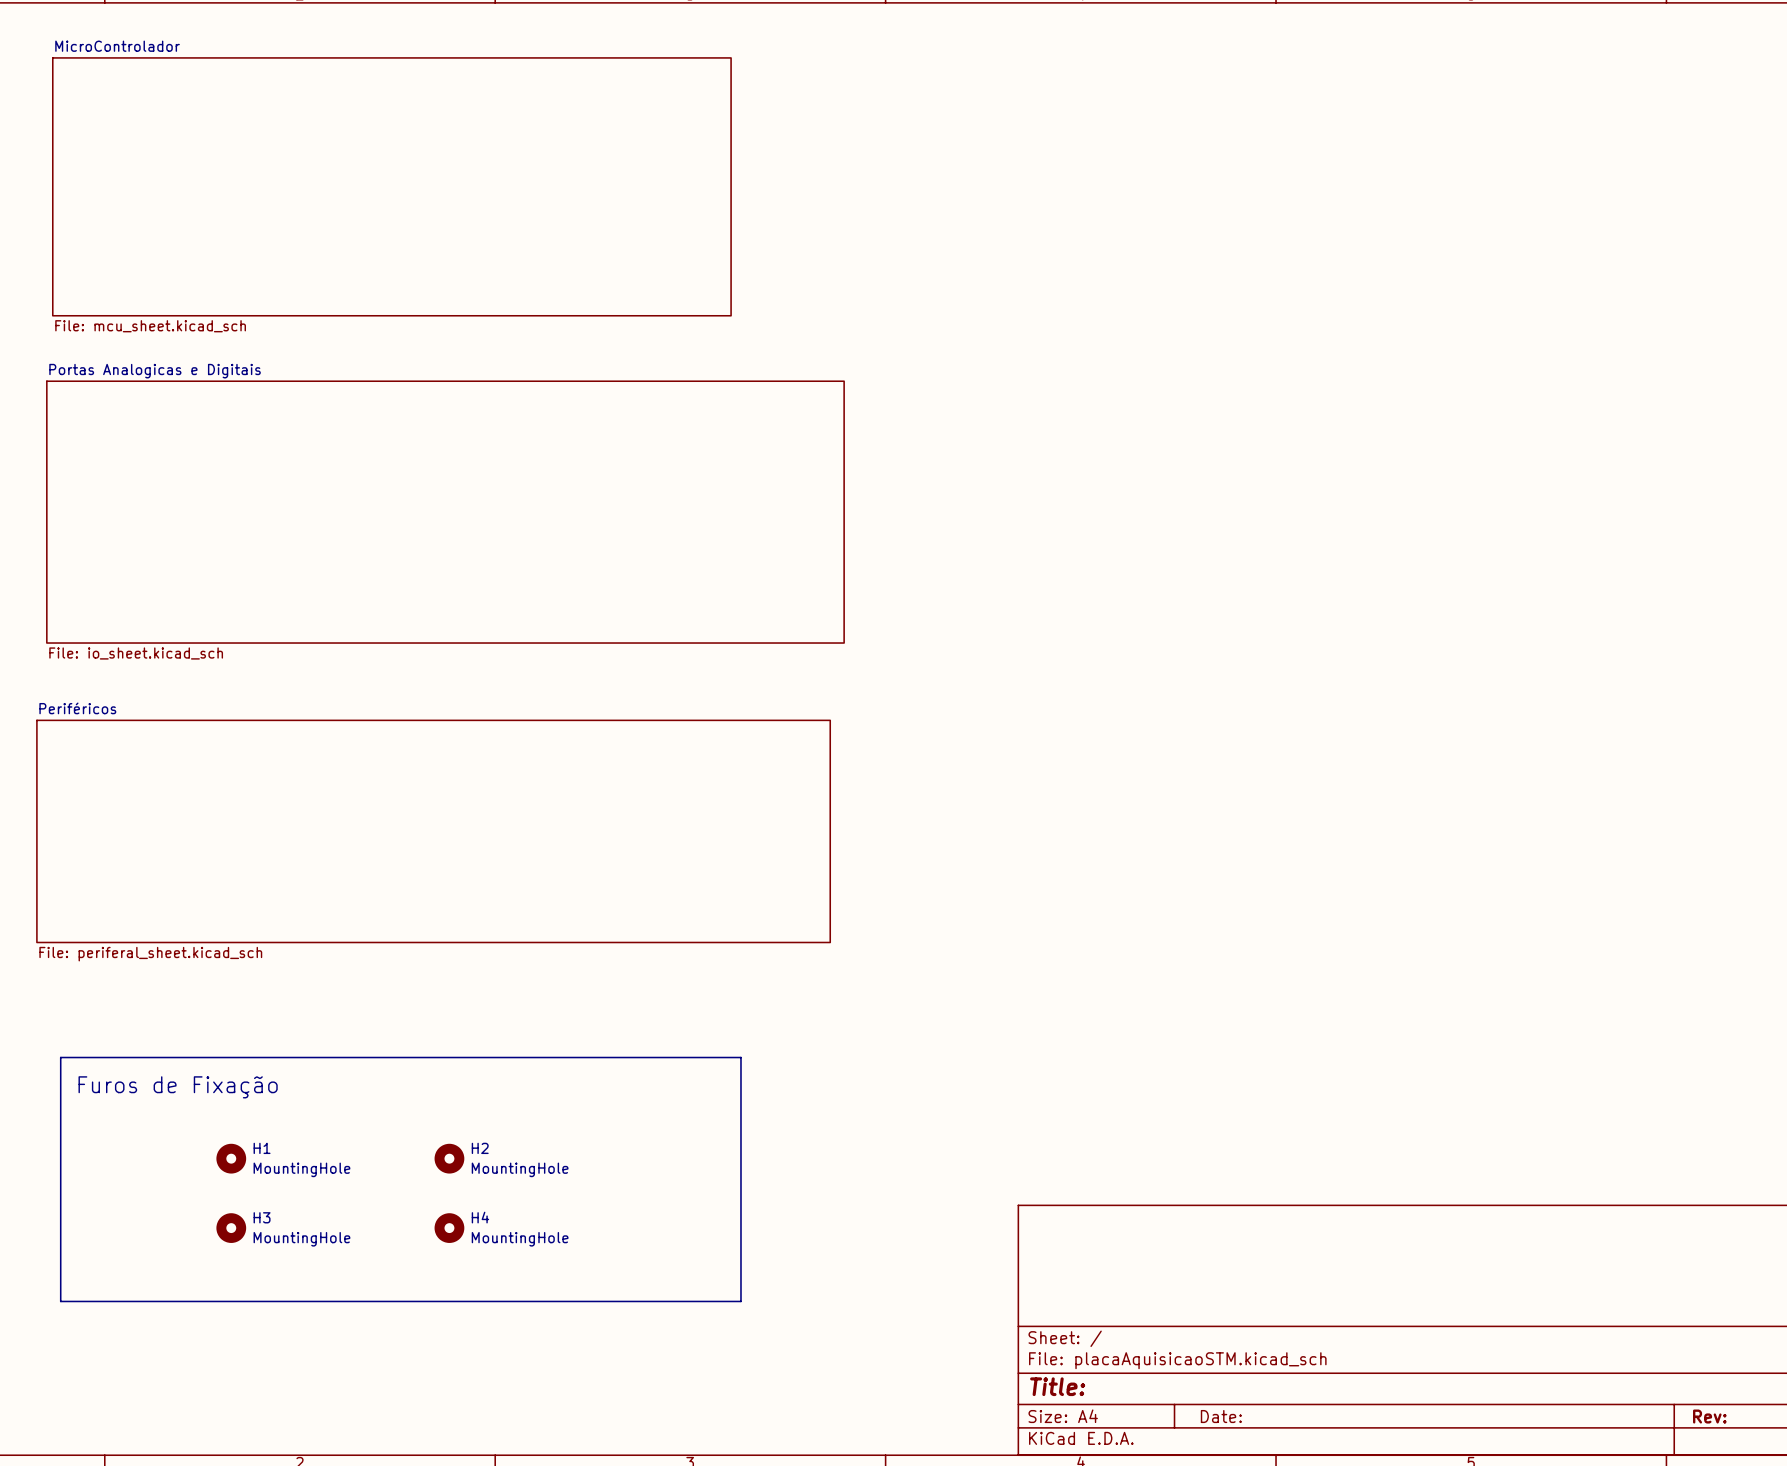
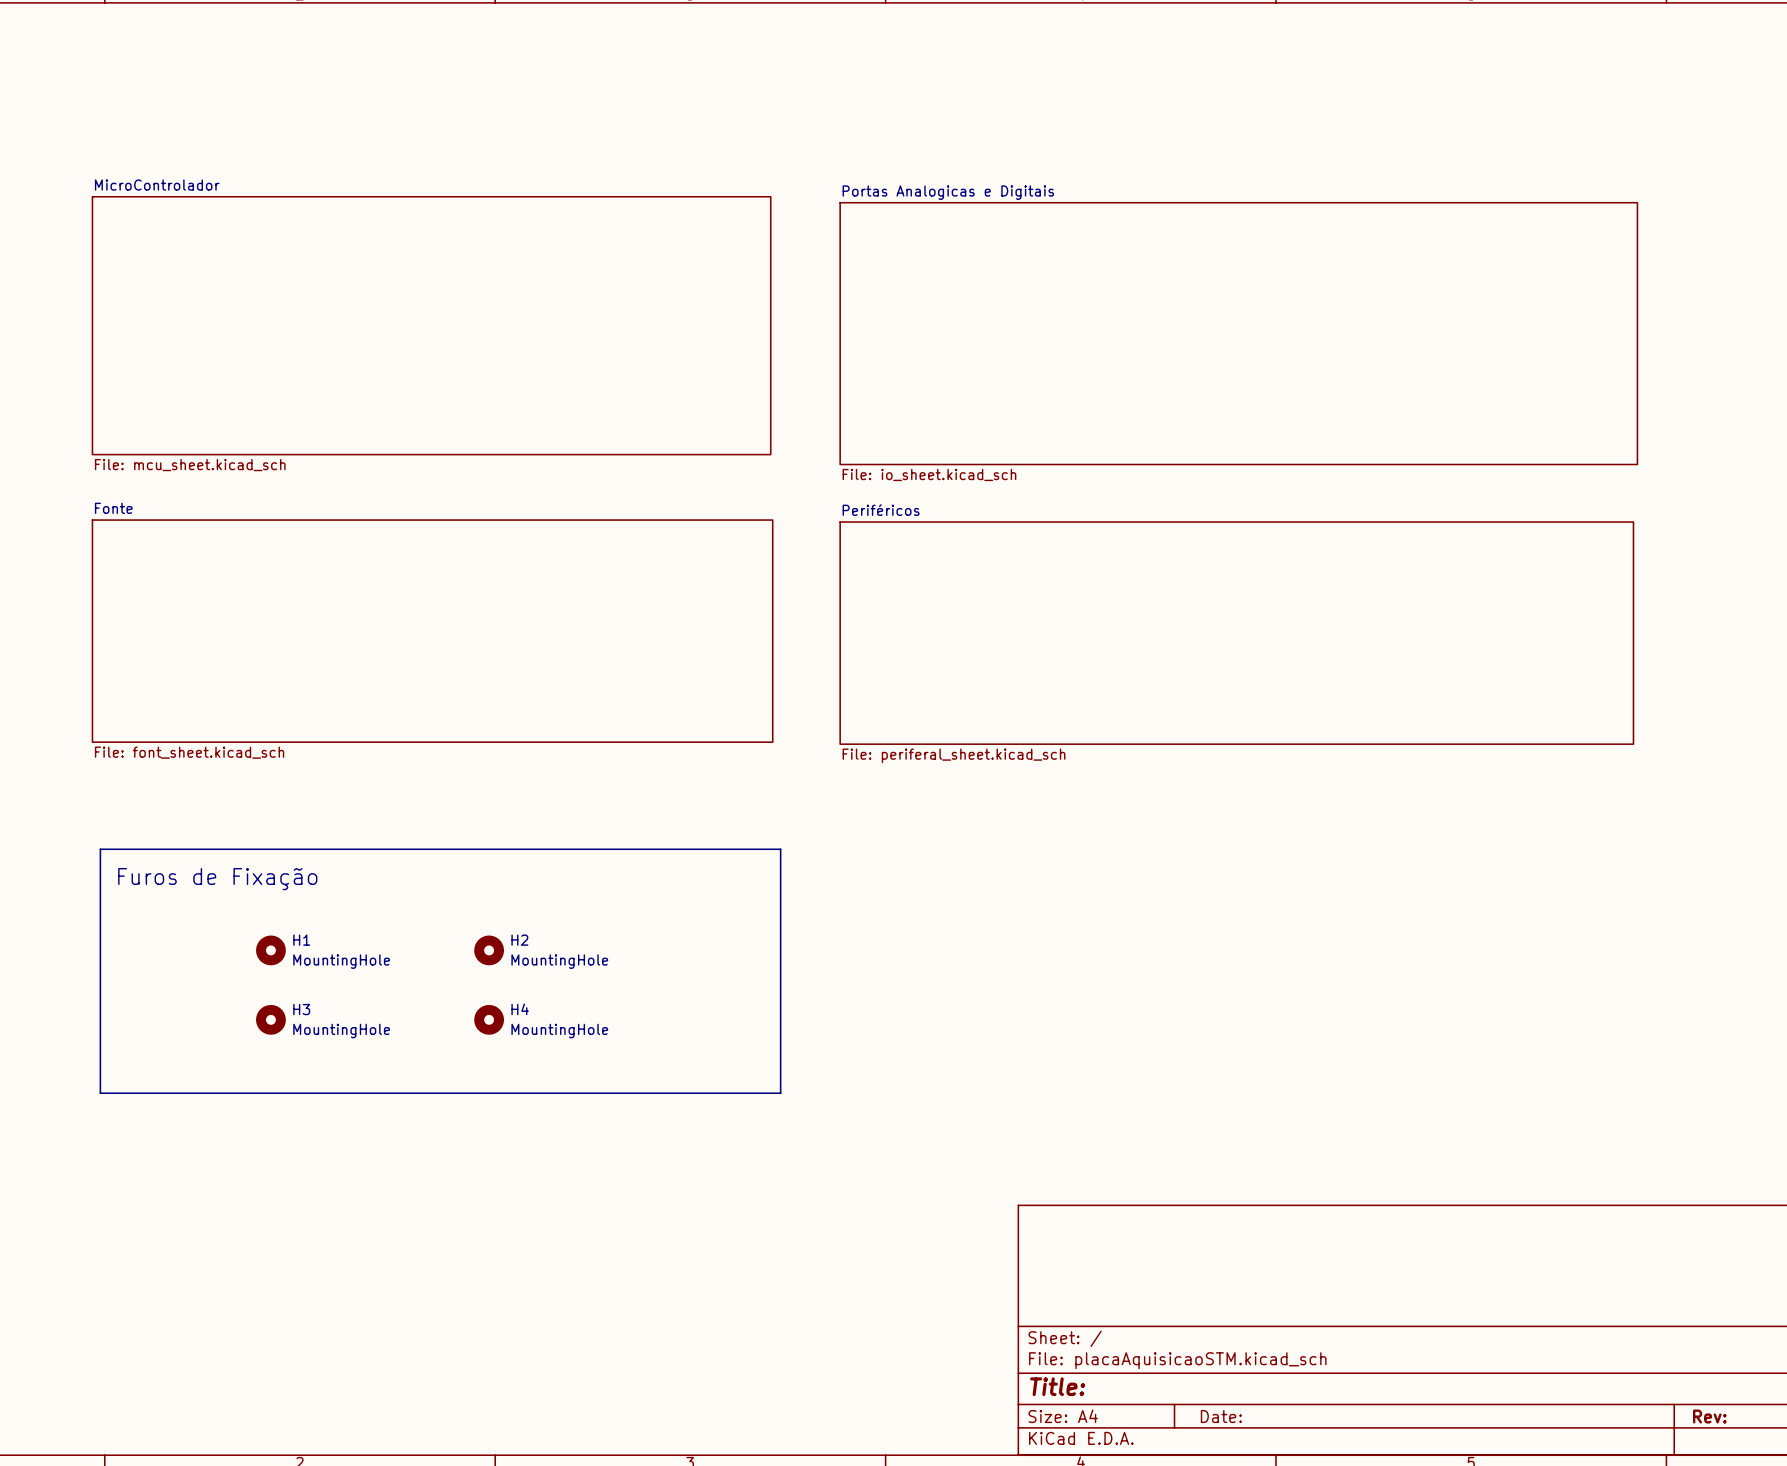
sheet MicroControlador position: (391, 186) -> (431, 325)
sheet Portas Analogicas e Digitais: none -> File: io_sheet.kicad_sch (1238, 333)
sheet Portas Analogicas e Digitais: File: io_sheet.kicad_sch (445, 512) -> none
sheet Fonte: none -> File: font_sheet.kicad_sch (432, 631)
sheet Periféricos: none -> File: periferal_sheet.kicad_sch (1236, 633)
sheet Periféricos: File: periferal_sheet.kicad_sch (433, 831) -> none
line: none -> (100, 849) (780, 849) (780, 1093) (100, 1093) (100, 849)
text: none -> Furos de Fixação (217, 879)
line: (60, 1057) (740, 1057) (740, 1301) (60, 1301) (60, 1057) -> none
text: Furos de Fixação (178, 1087) -> none
H1 position: (231, 1158) -> (270, 950)
H2 position: (449, 1158) -> (489, 950)
H3 position: (231, 1228) -> (270, 1019)
H4 position: (449, 1228) -> (489, 1019)

